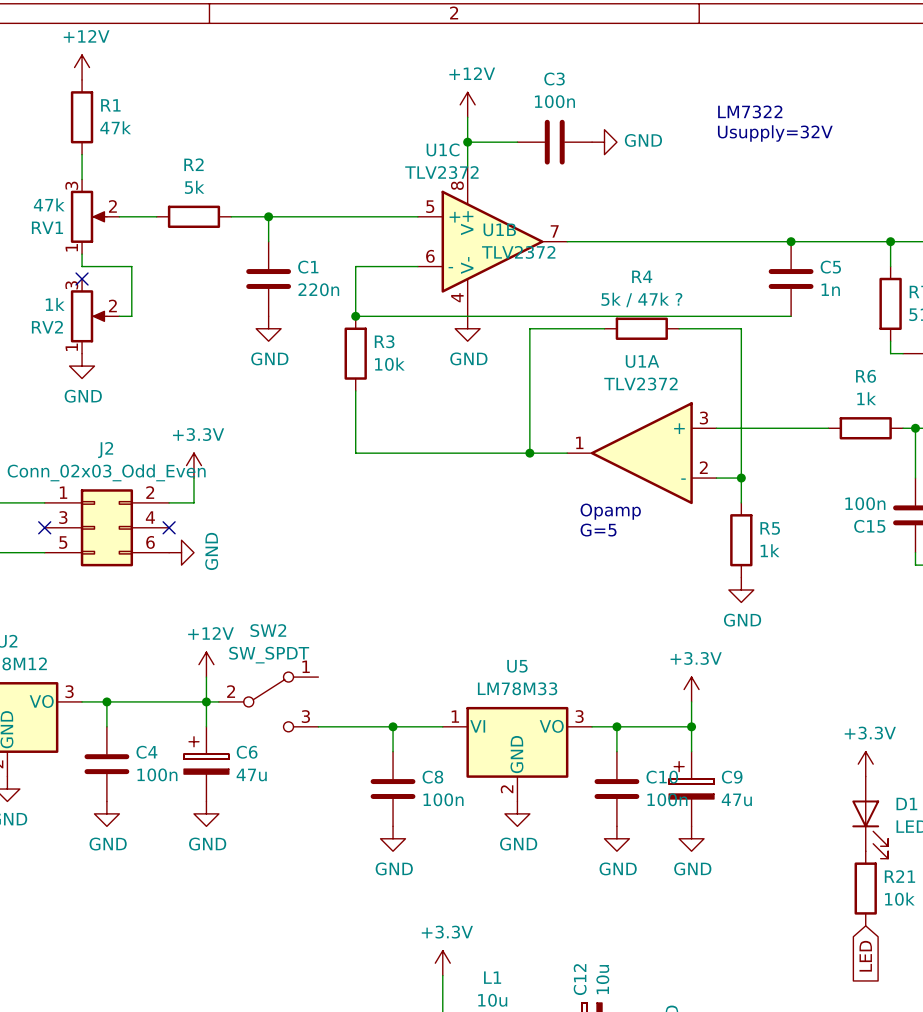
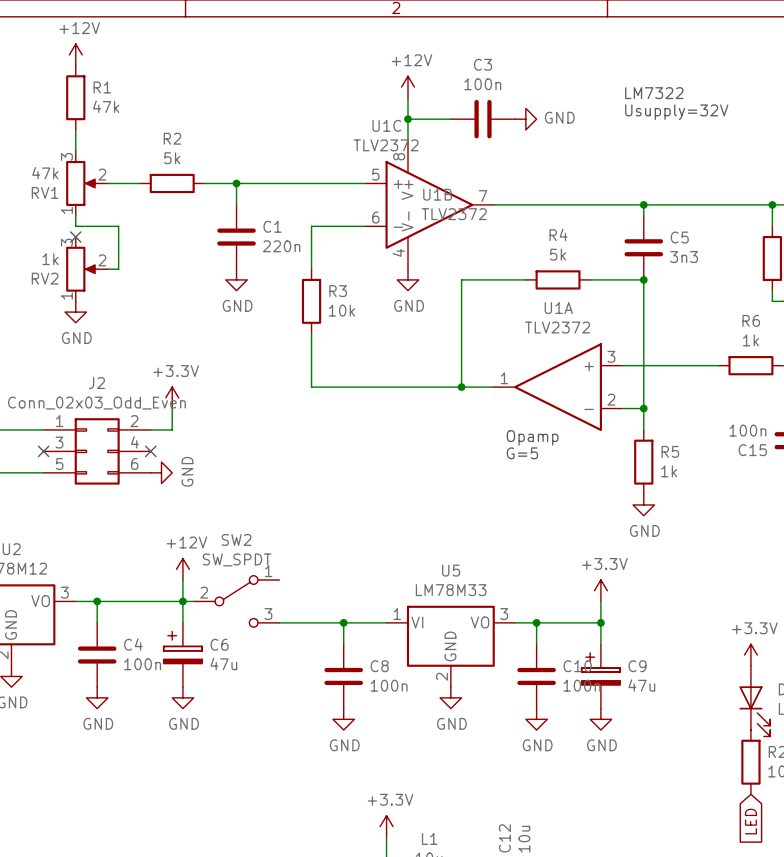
wire: none -> (643, 204) (643, 215)
junction position: (791, 241) -> (643, 204)
C5 position: (791, 279) -> (643, 247)
C5 value: 1n (830, 289) -> 3n3 (684, 257)
R4 value: 5k / 47k ? (641, 299) -> 5k (558, 254)
wire: (355, 316) (791, 316) -> none
junction: (355, 316) -> none
junction: none -> (643, 279)

